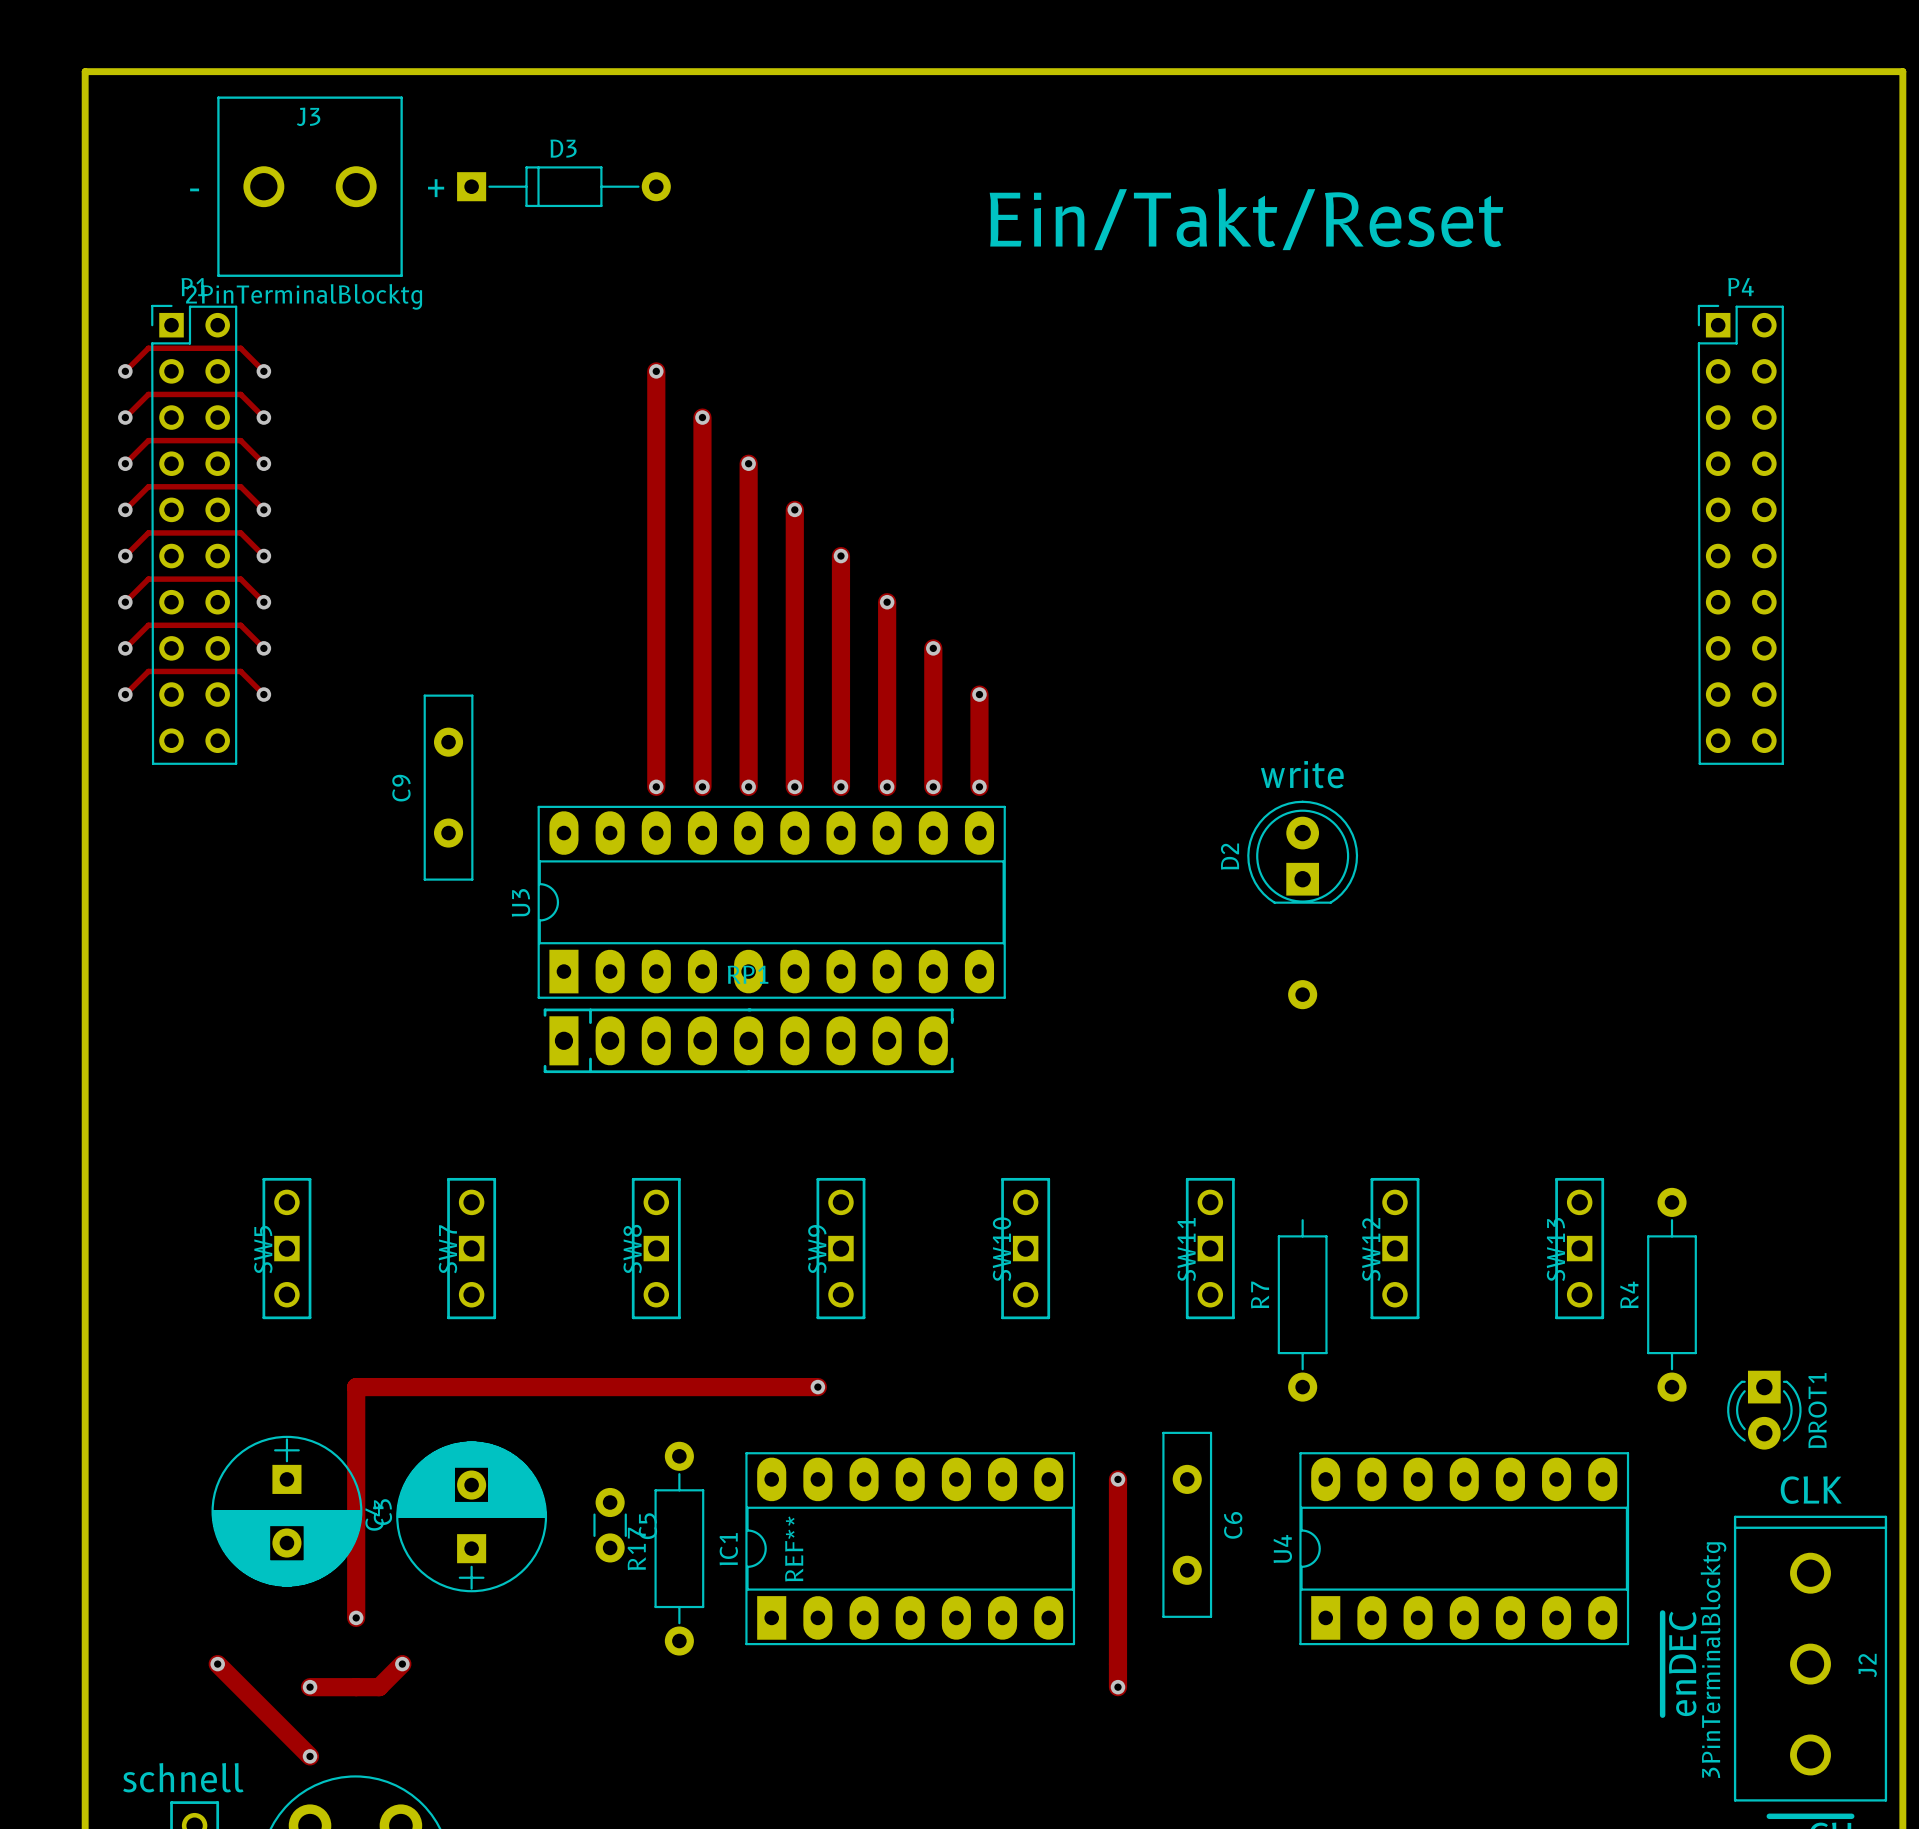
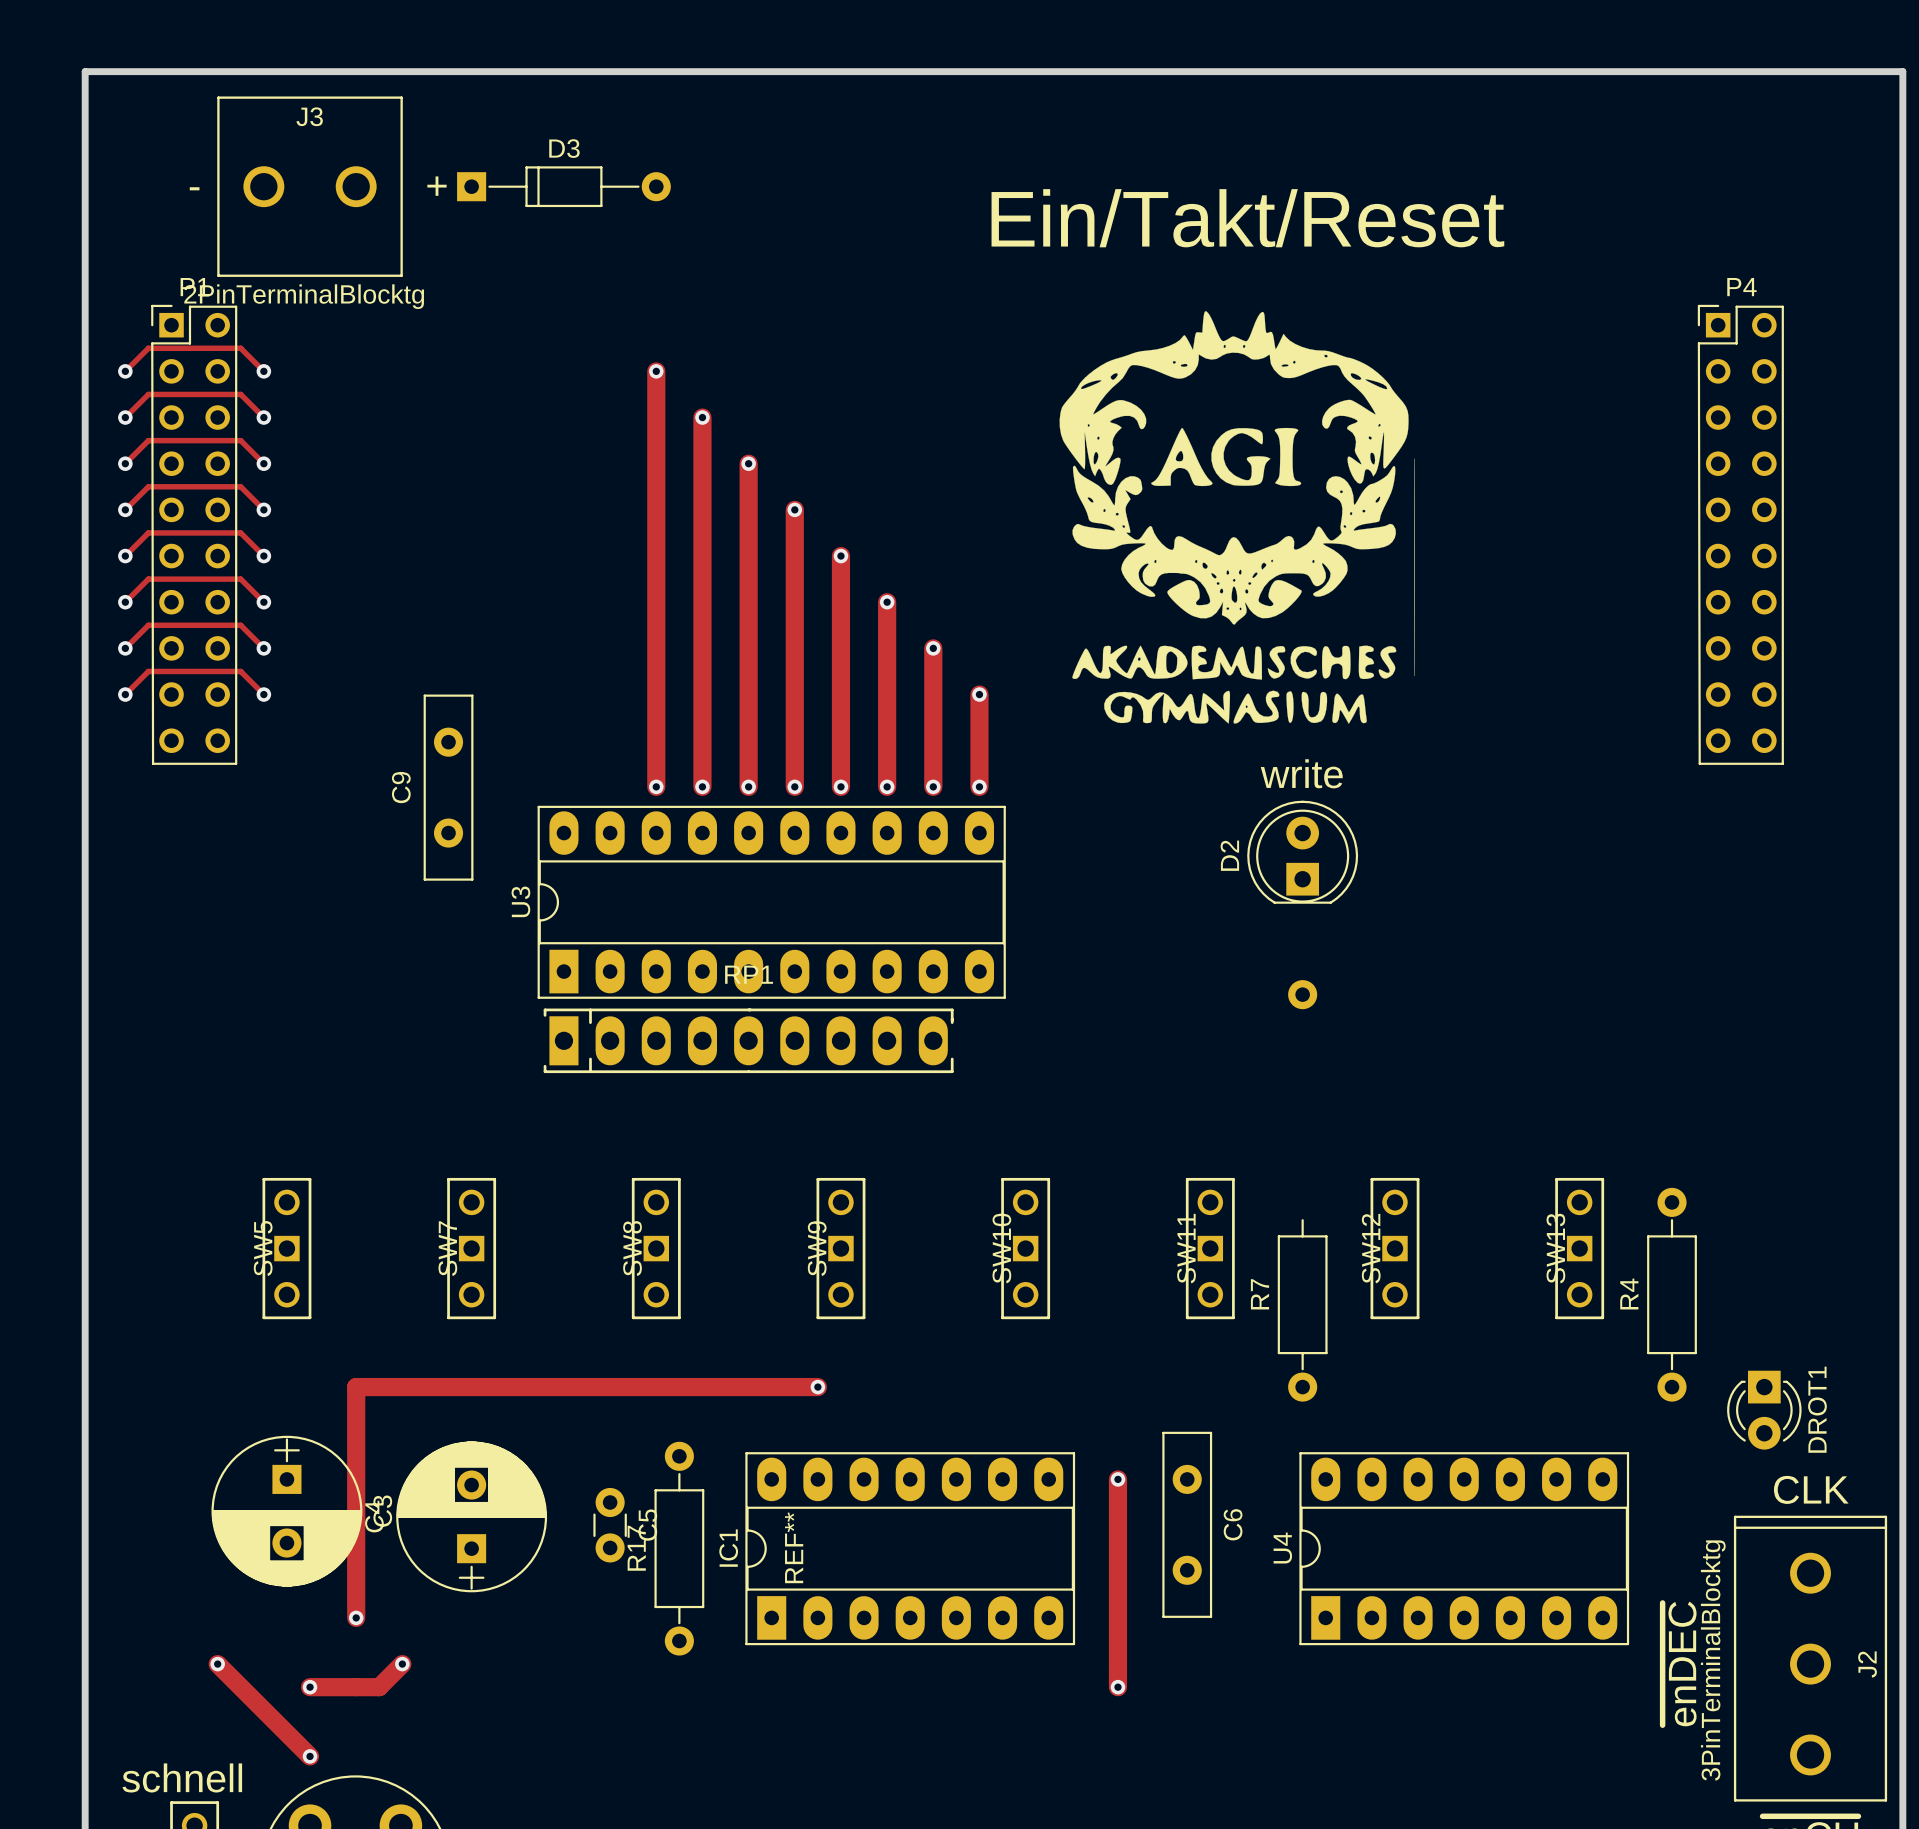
drawing: none -> [1059, 311, 1415, 724]

